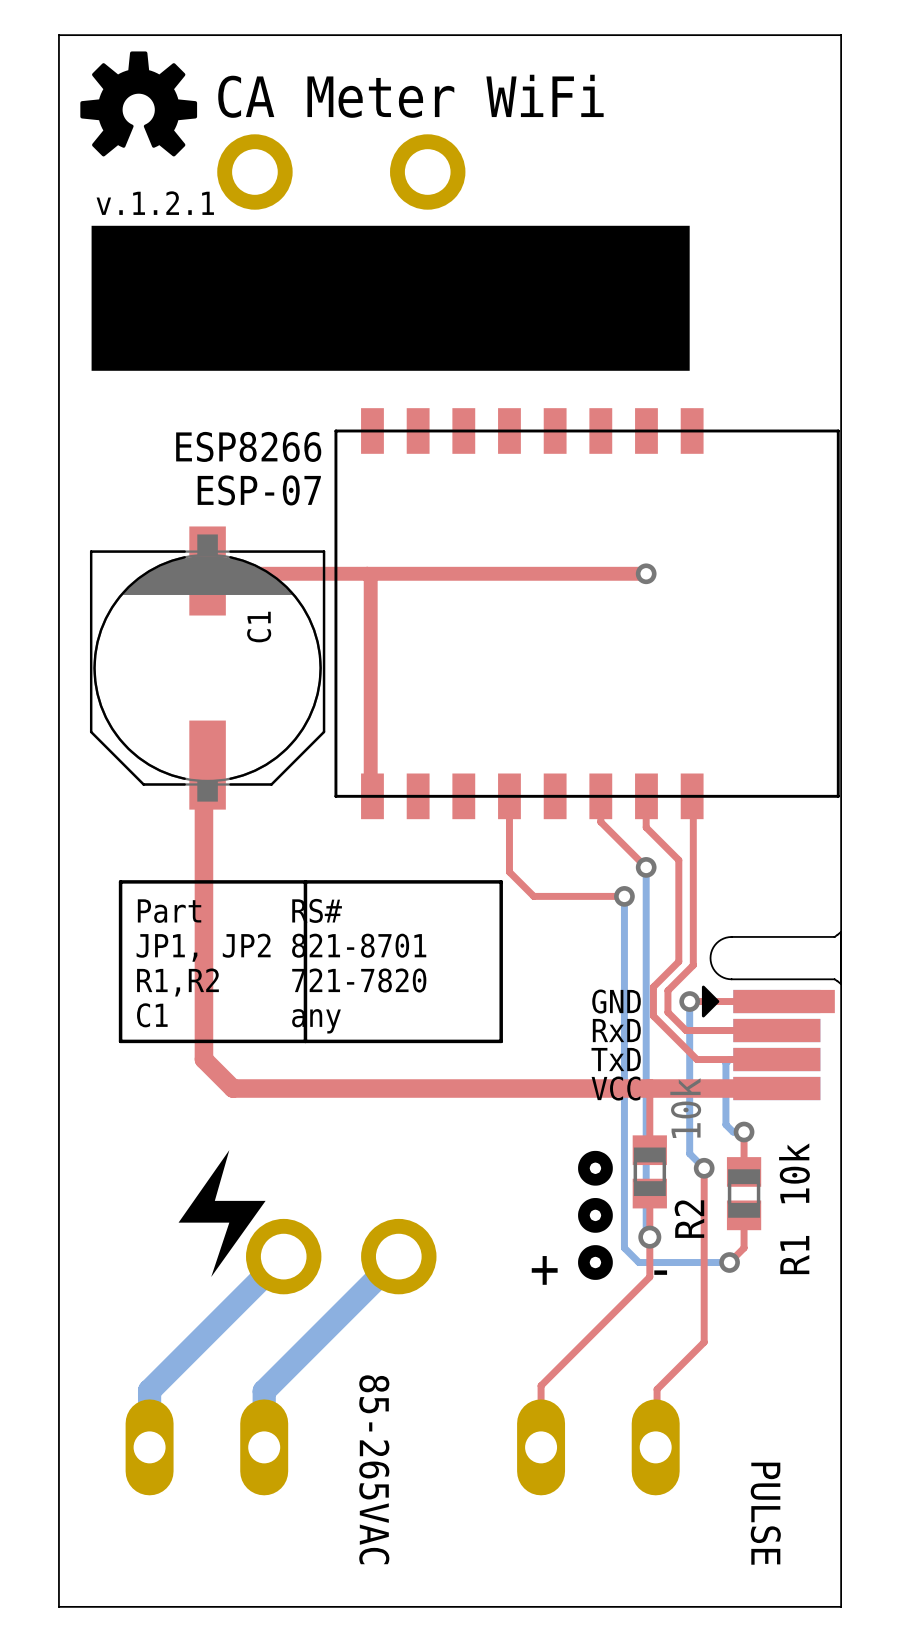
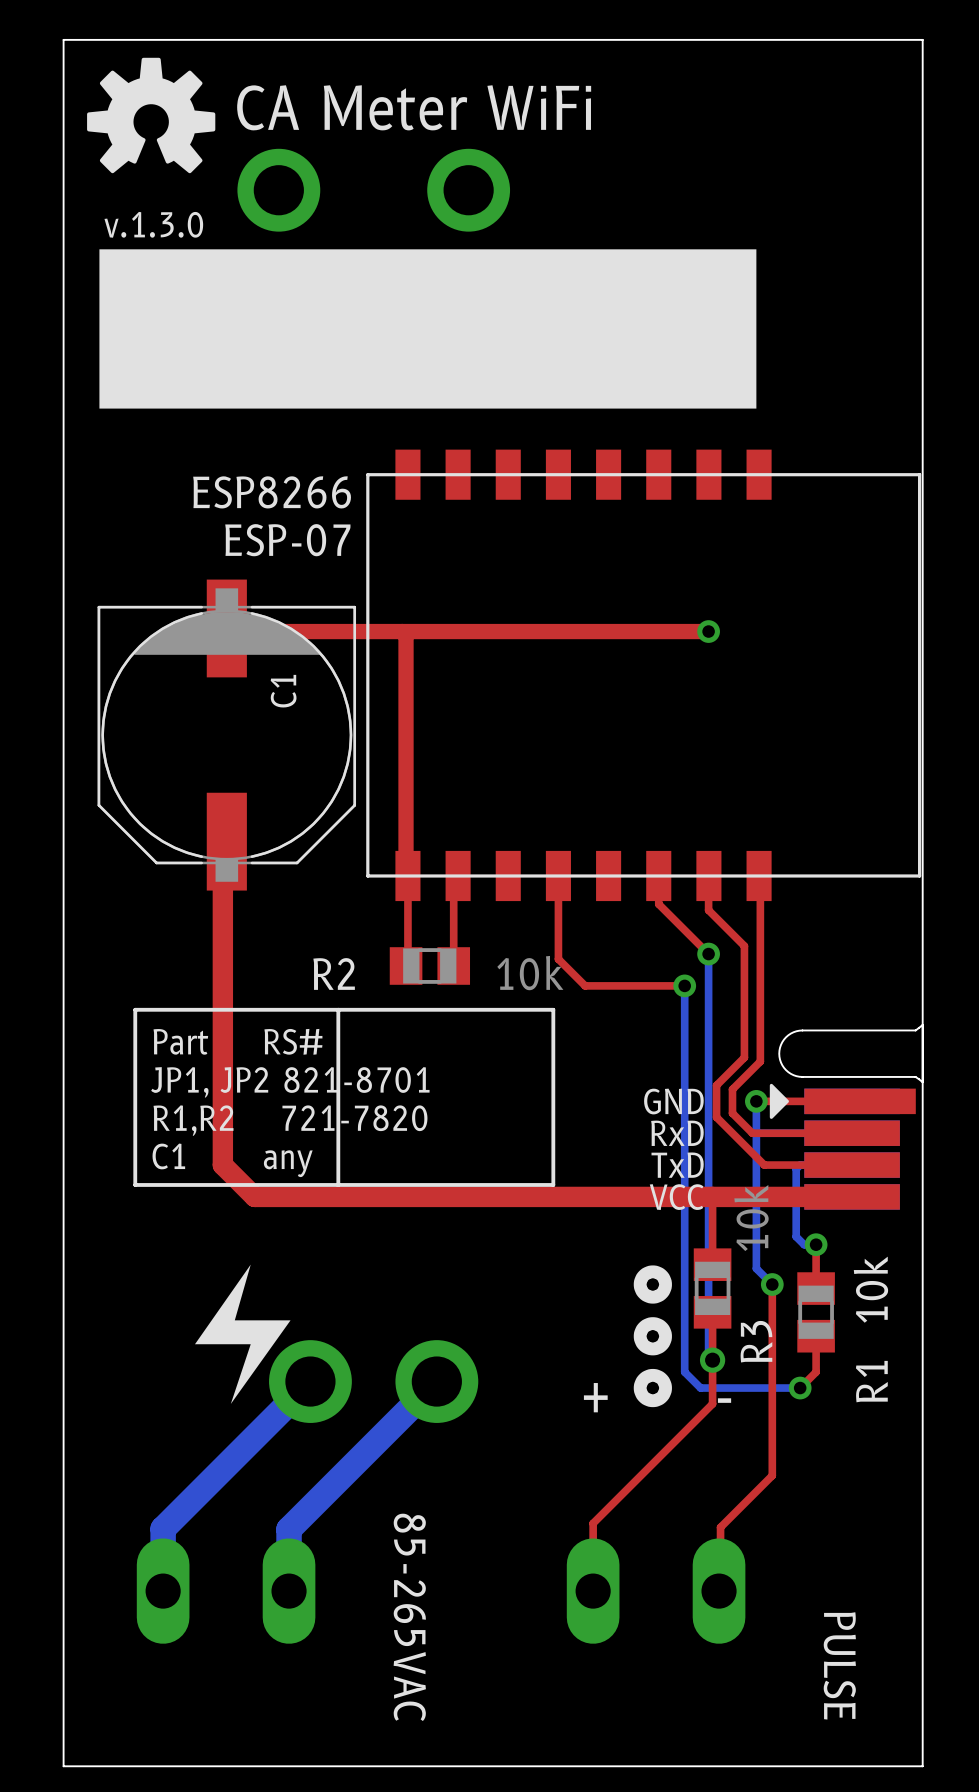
text: v.1.2.1 (155, 203) -> v.1.3.0 (153, 224)
top track: none -> (407, 875) (407, 964) (406, 965)
top track: none -> (458, 875) (453, 880) (453, 965)
R2: none -> 10k (429, 965)
line: (120, 881) (501, 881) (501, 1041) (120, 1041) (120, 881) -> (135, 1009) (135, 1184) (553, 1184) (553, 1009) (135, 1009)
line: (305, 881) (305, 1041) -> (338, 1009) (338, 1184)
text: Part RS# (239, 910) -> none
text: JP1, JP2 821-8701 (281, 947) -> Part RS# (237, 1041)
text: R1,R2 721-7820 (281, 982) -> JP1, JP2 821-8701 (290, 1082)
text: C1 any (238, 1018) -> R1,R2 721-7820 (290, 1120)
text: none -> C1 any (232, 1160)
R2 name: R2 (689, 1219) -> R3 (756, 1341)

